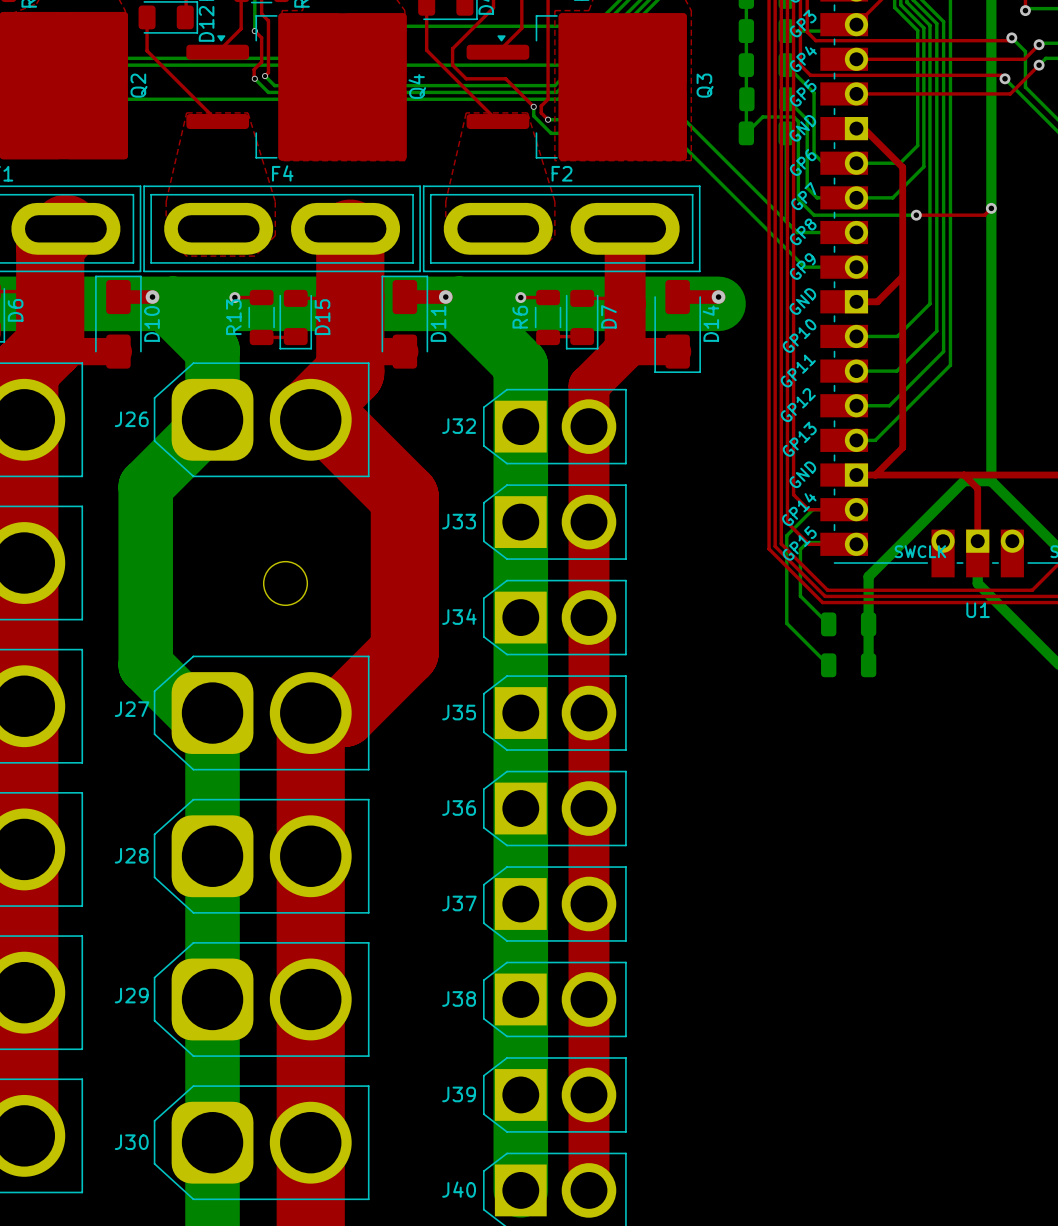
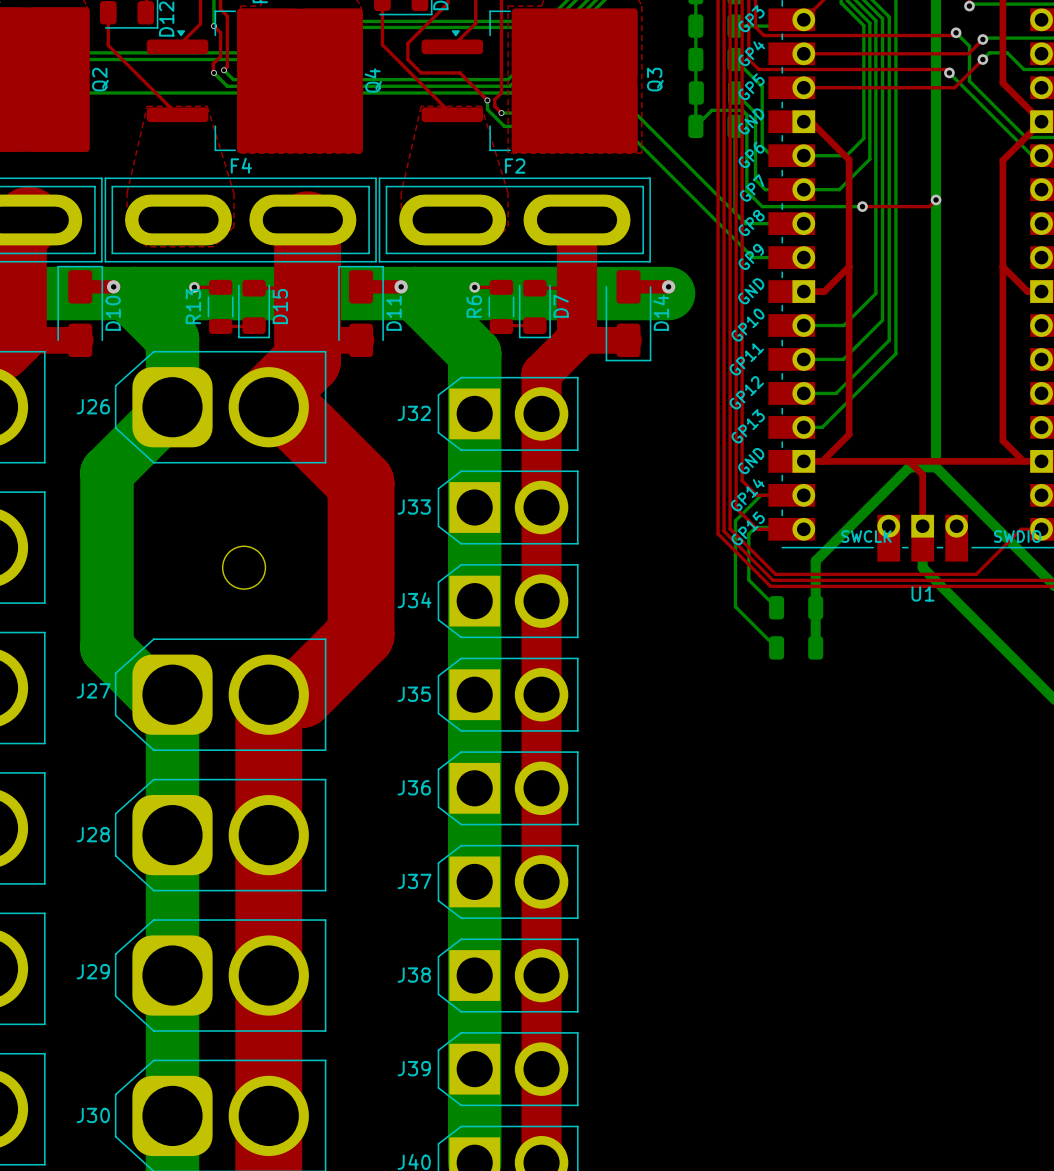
bottom track: (596, 32) (563, 65) (319, 65) -> (548, 27) (309, 27) (277, 59)

